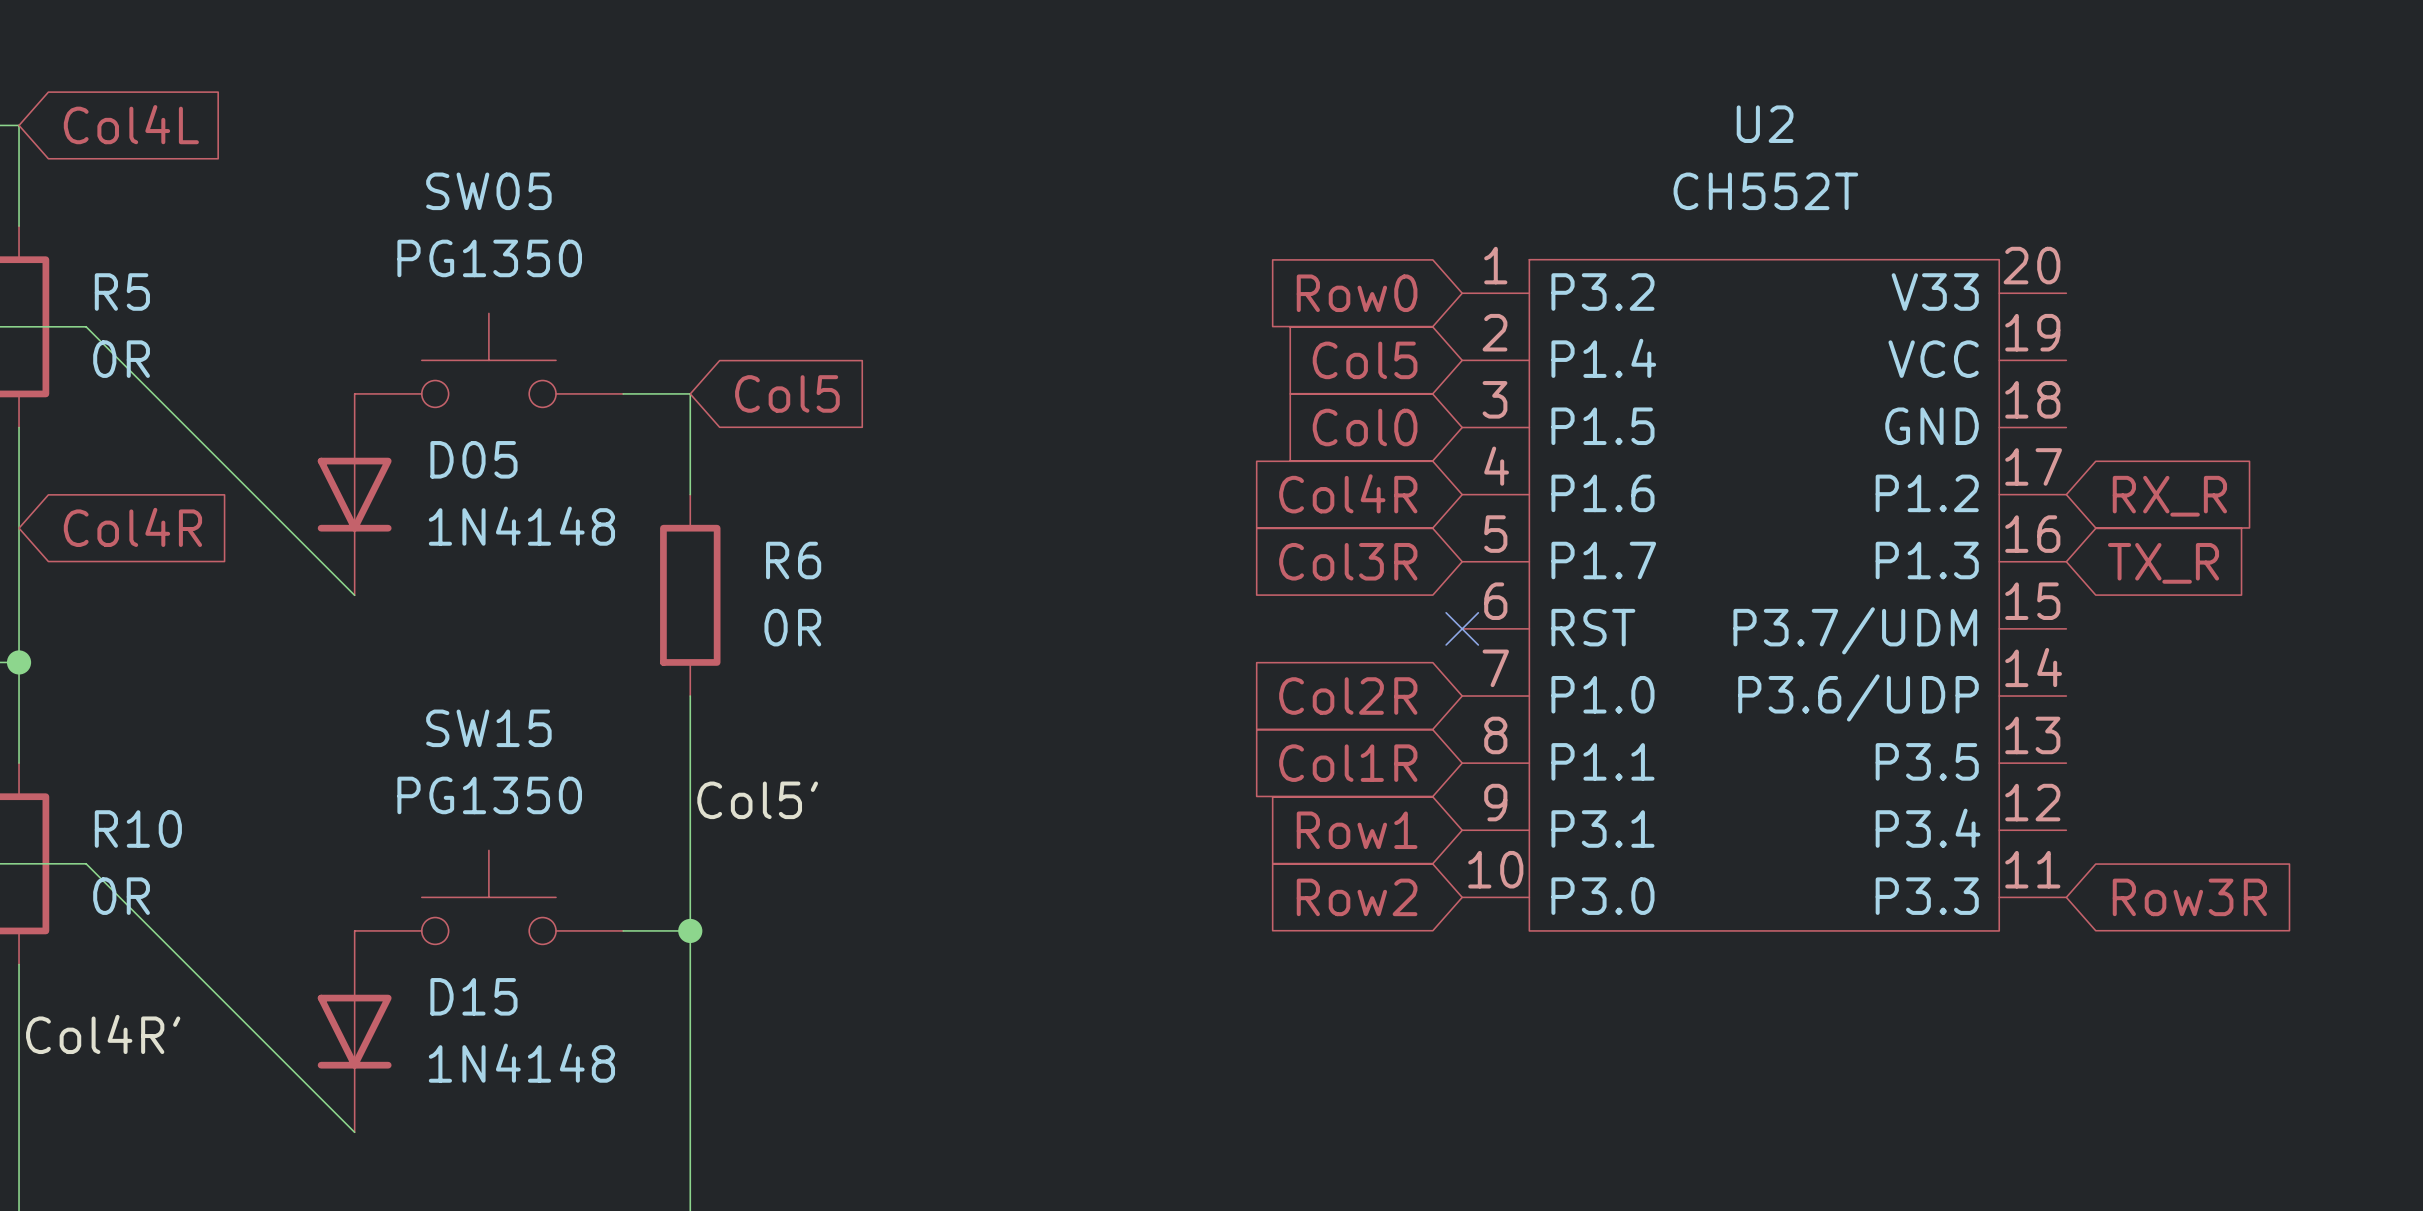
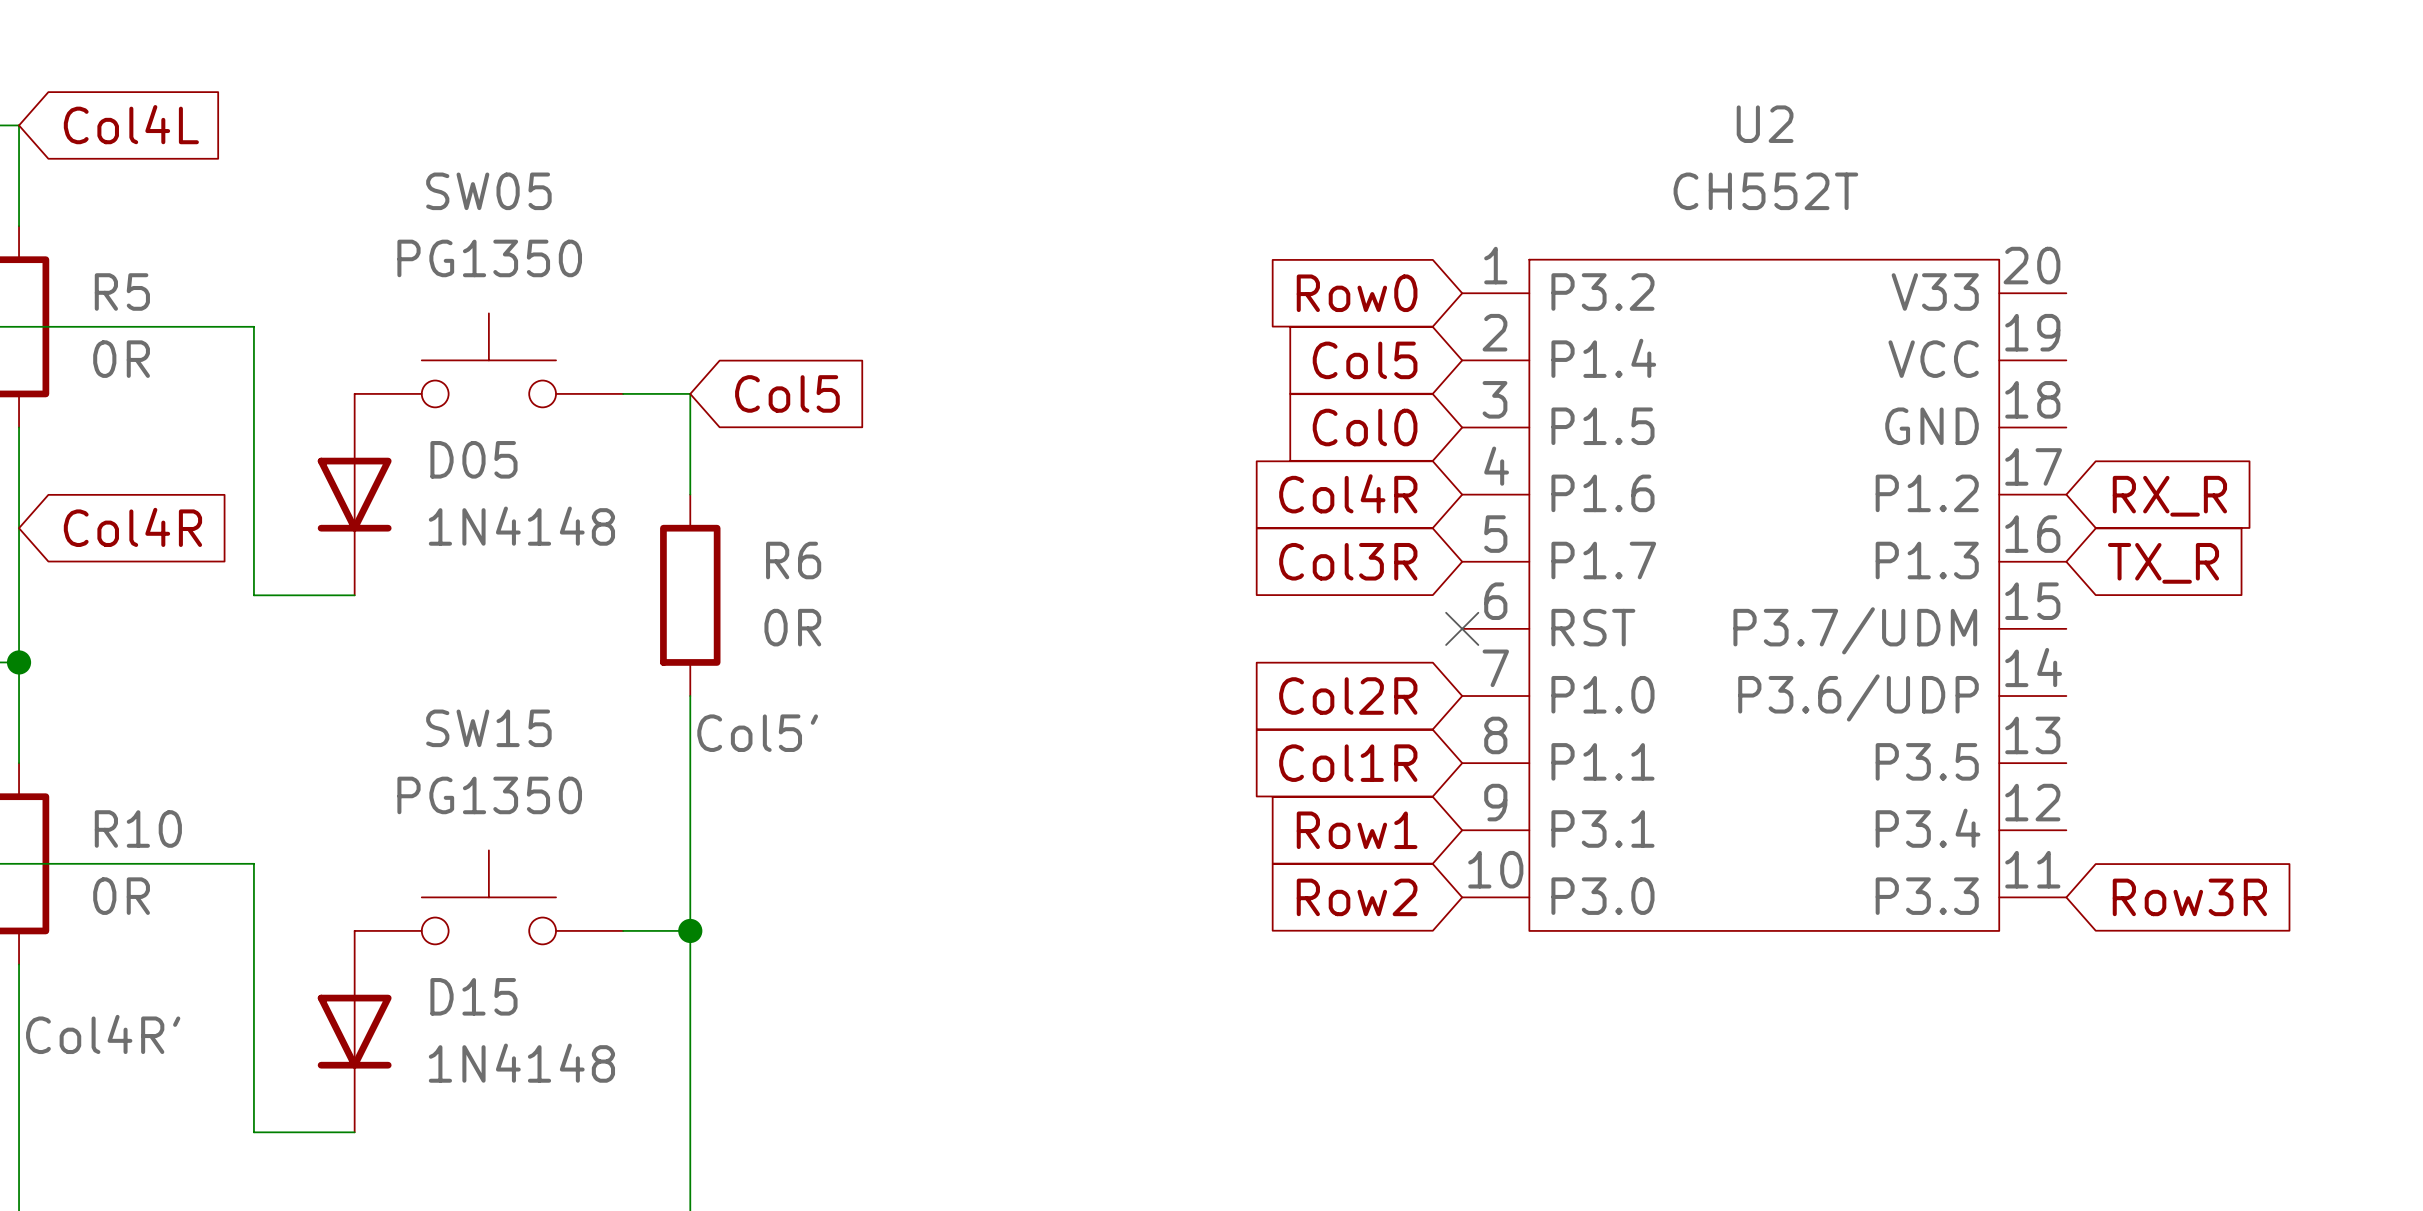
wire: (86, 326) (354, 595) -> (86, 326) (253, 326) (253, 595) (354, 595)
label position: Col5' (757, 800) -> Col5' (757, 733)
wire: (86, 863) (354, 1132) -> (86, 863) (253, 863) (253, 1132) (354, 1132)

